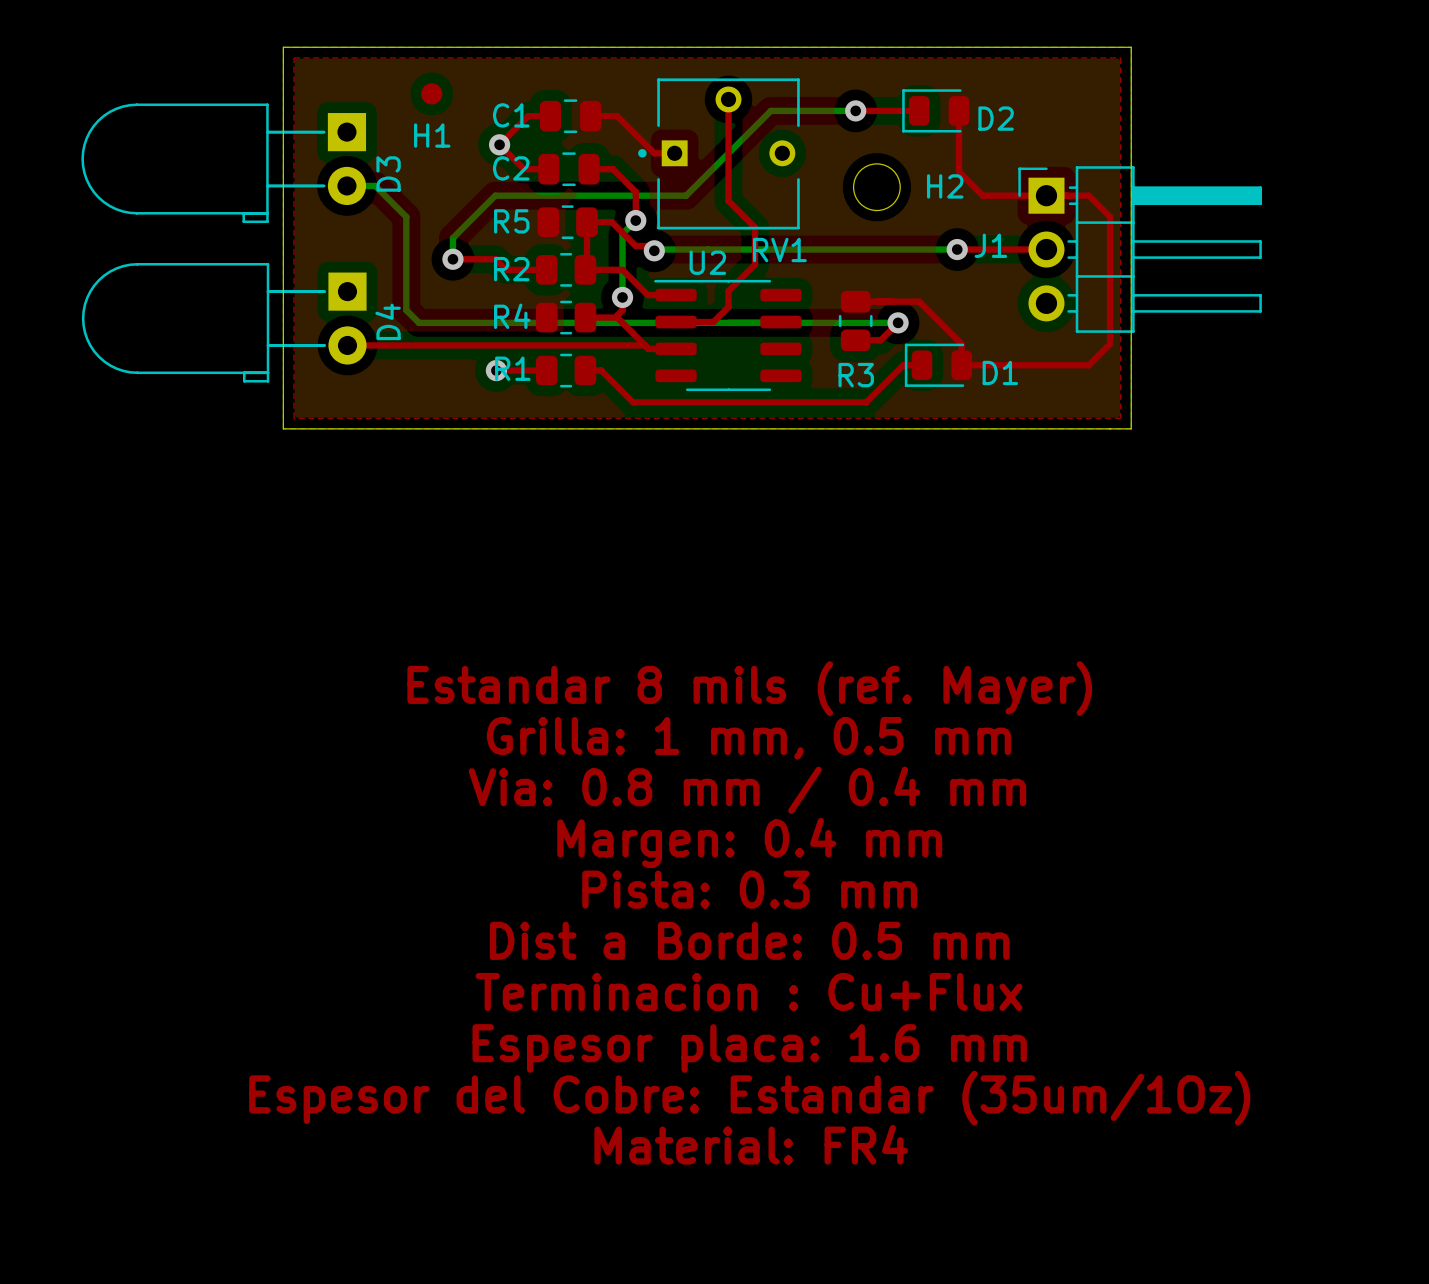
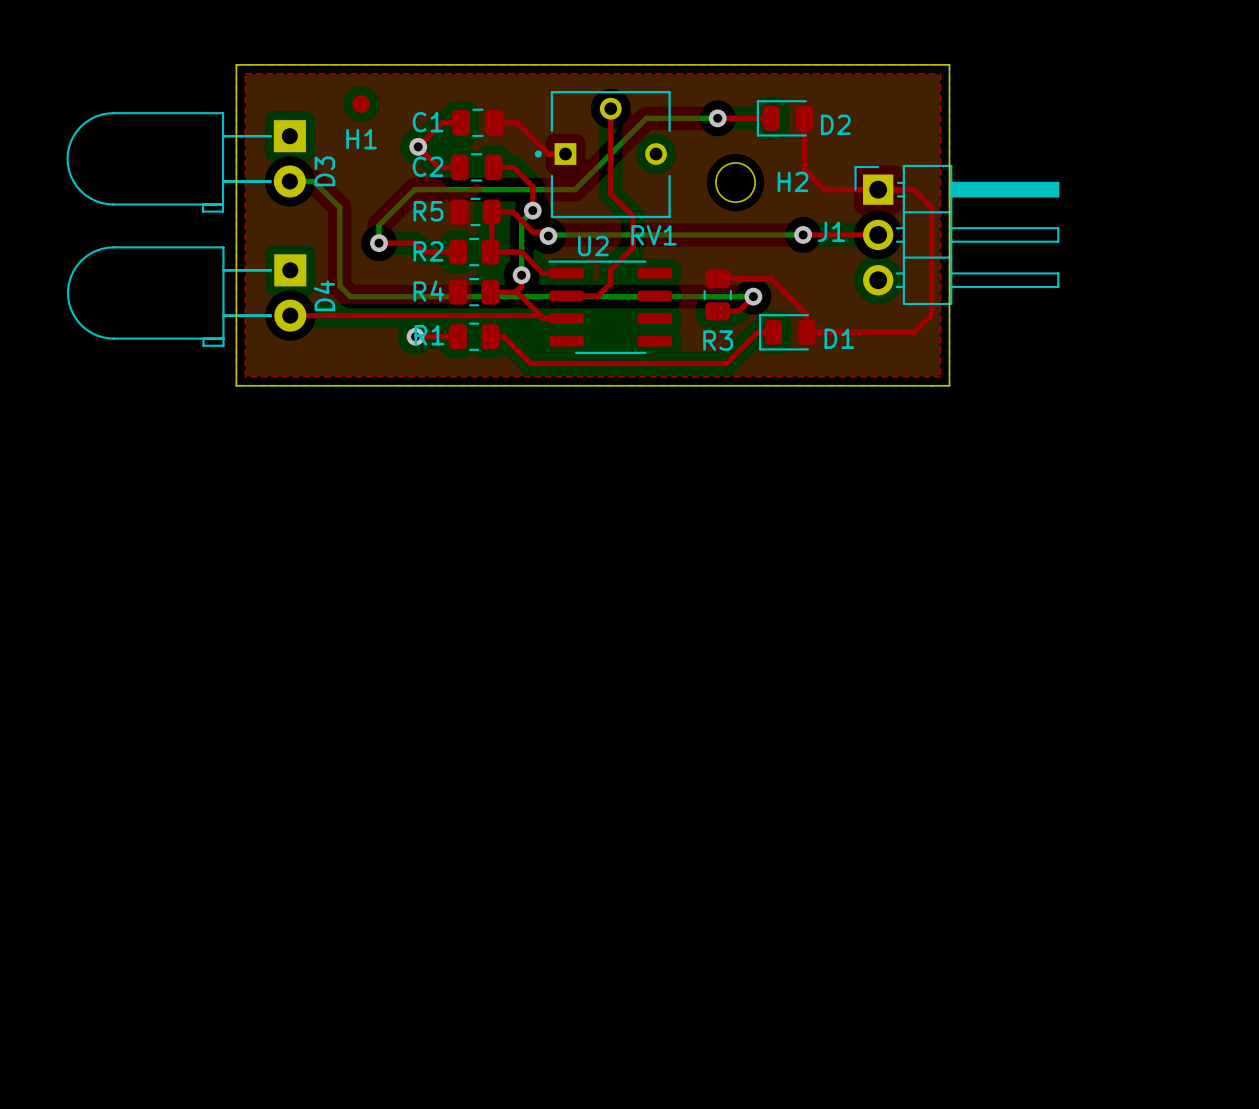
text: Estandar 8 mils (ref. Mayer) (749, 688) -> none
text: Grilla: 1 mm, 0.5 mm (748, 738) -> none
text: Via: 0.8 mm / 0.4 mm (747, 790) -> none
text: Margen: 0.4 mm (749, 842) -> none
text: Pista: 0.3 mm (749, 889) -> none
text: Dist a Borde: 0.5 mm (749, 940) -> none
text: Terminacion : Cu+Flux (748, 992) -> none
text: Espesor placa: 1.6 mm (749, 1048) -> none
text: Espesor del Cobre: Estandar (35um/1Oz) (749, 1098) -> none
text: Material: FR4 (751, 1144) -> none

